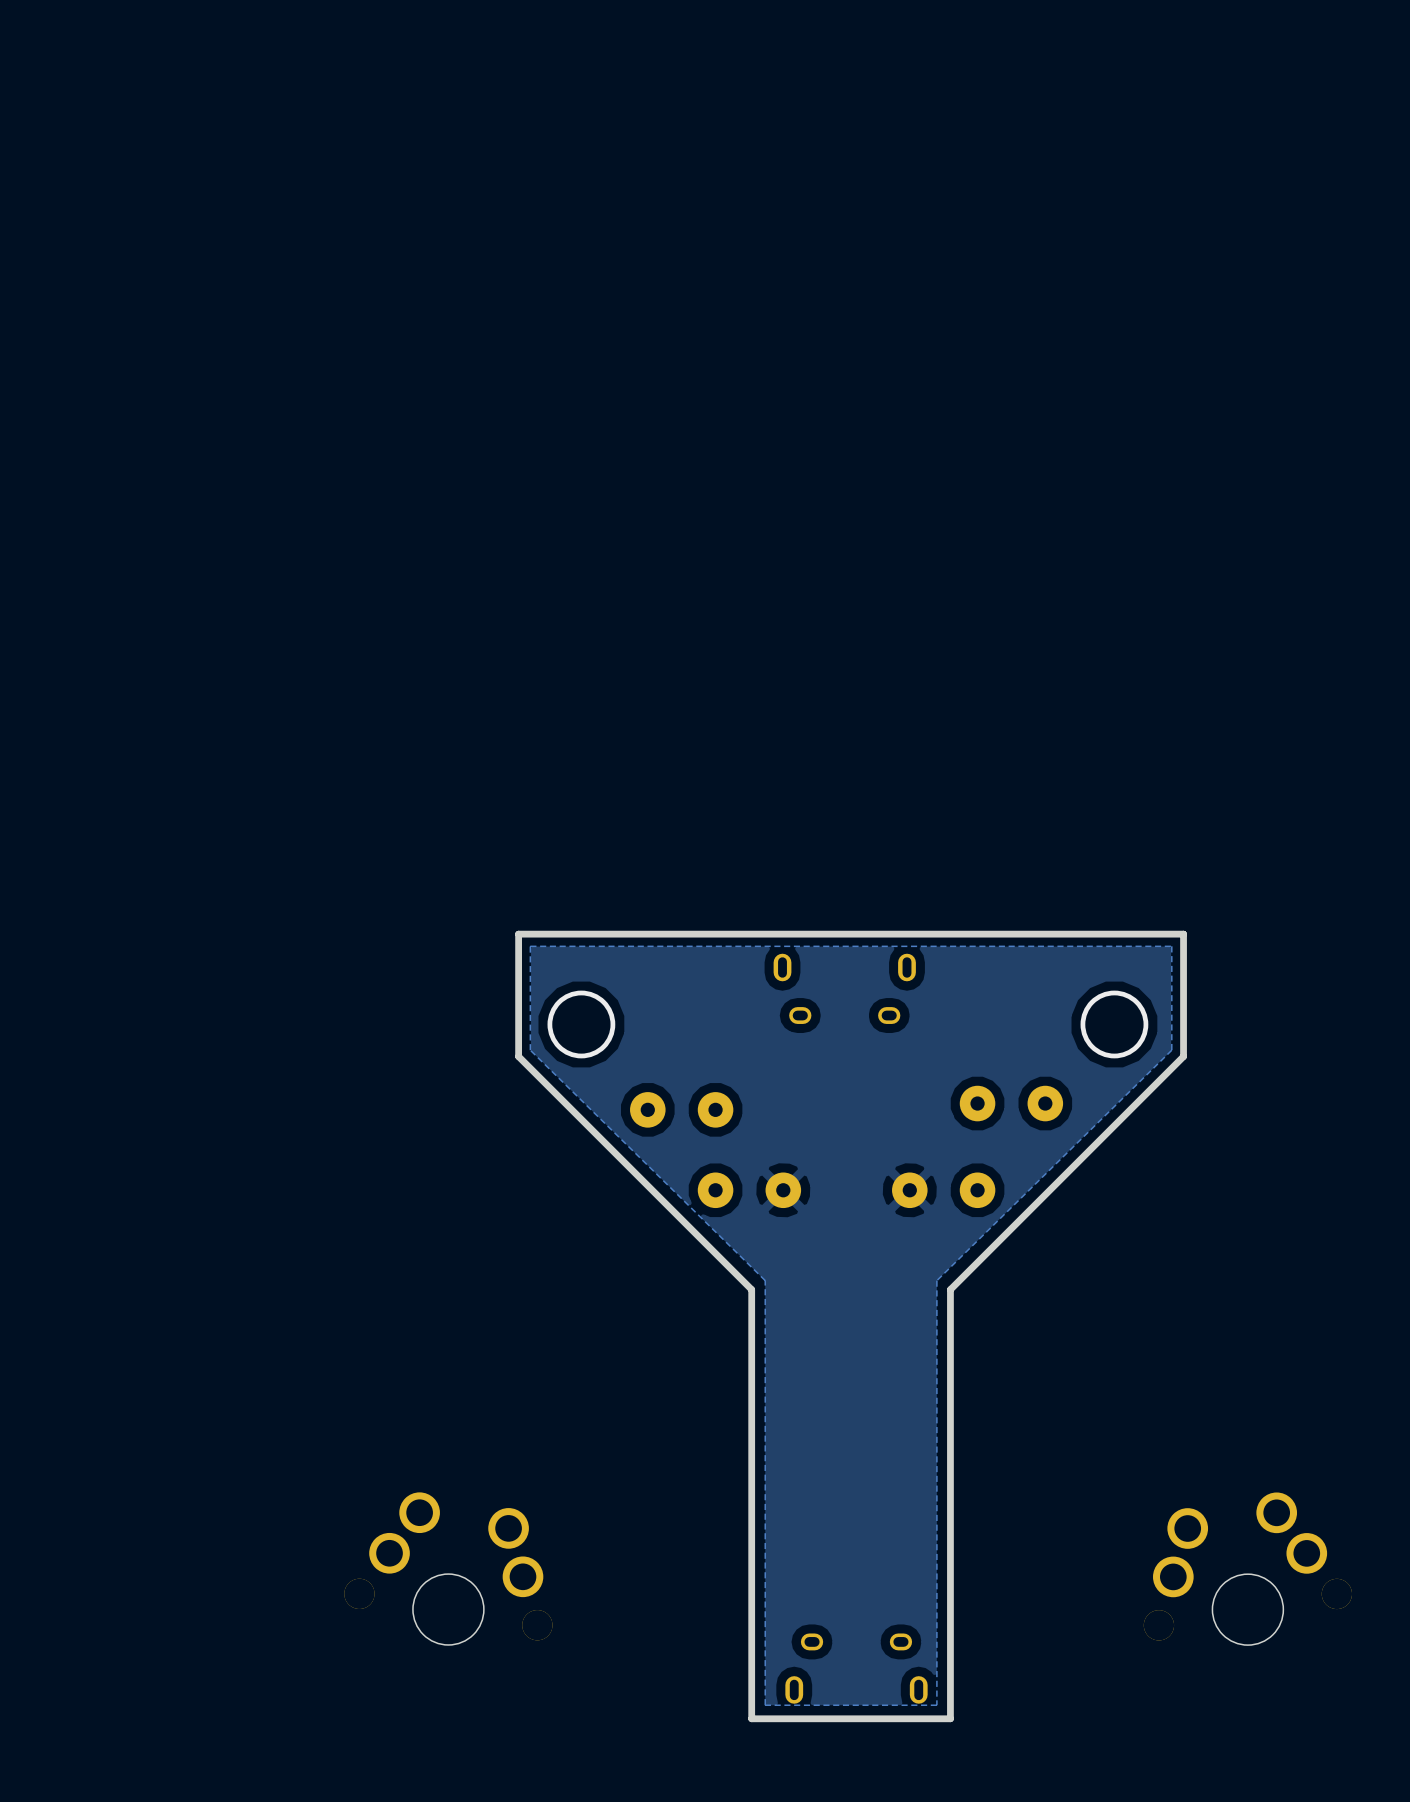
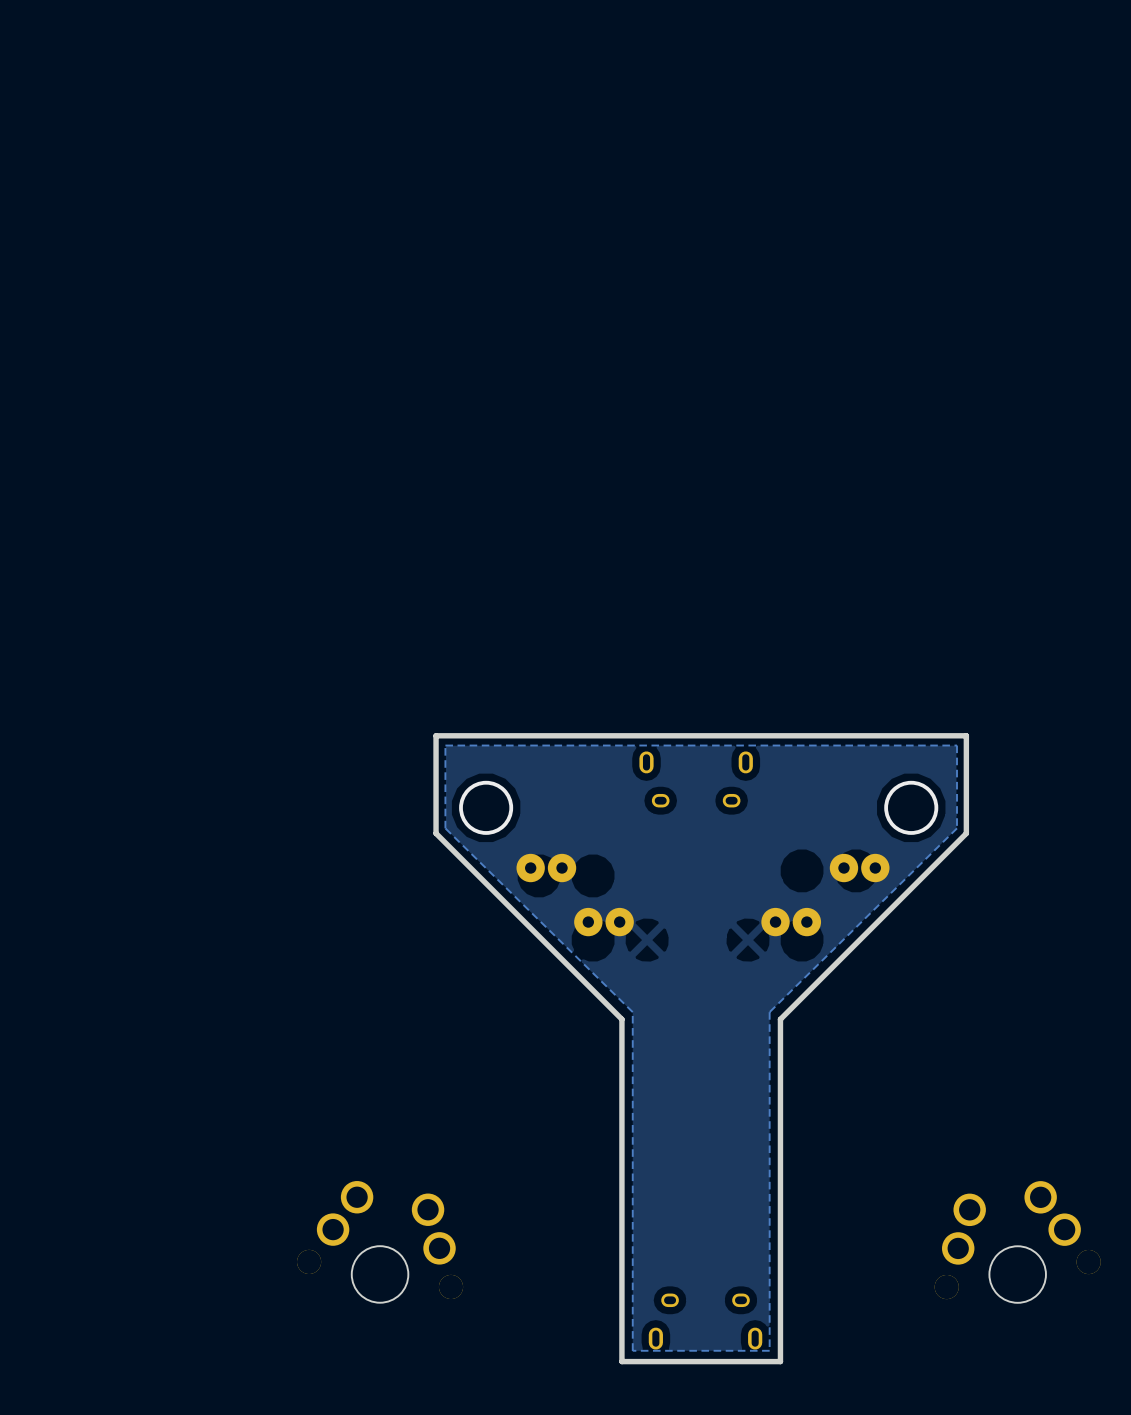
part: none -> (546, 868)
part: none -> (859, 868)
part: (1011, 1103) -> none
part: (681, 1109) -> none
part: none -> (603, 922)
part: none -> (791, 922)
part: (749, 1190) -> none
part: (943, 1190) -> none

